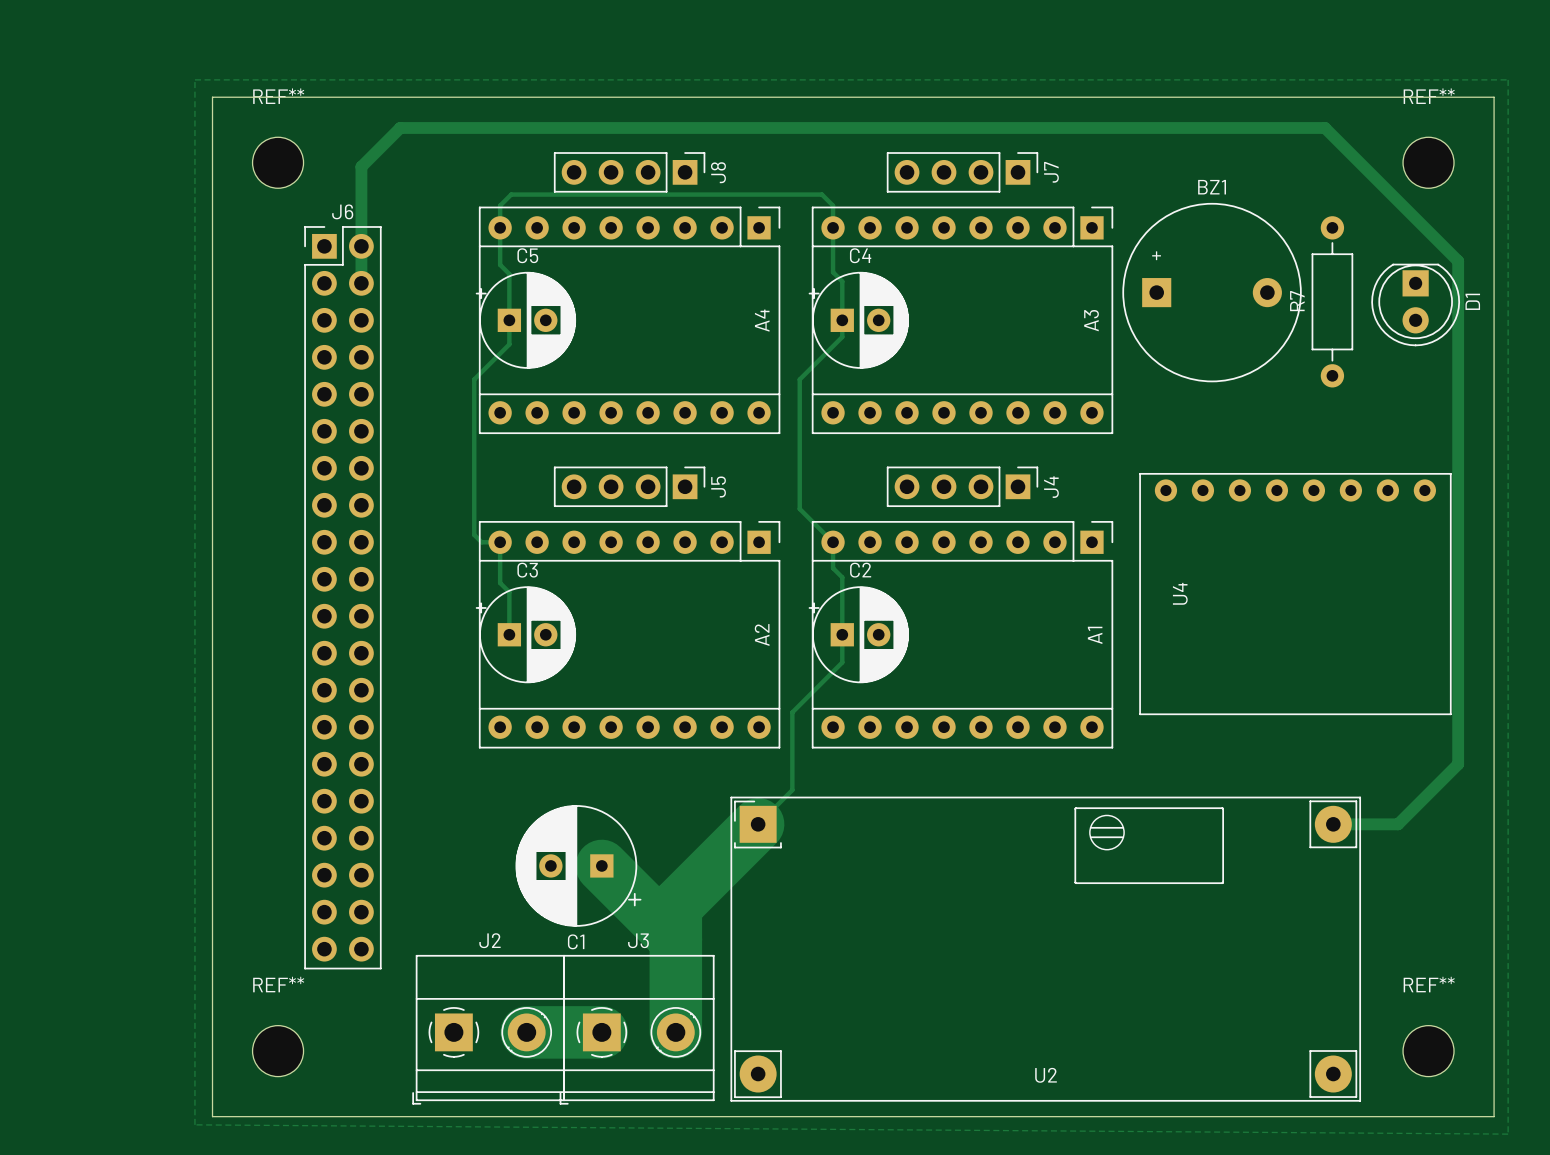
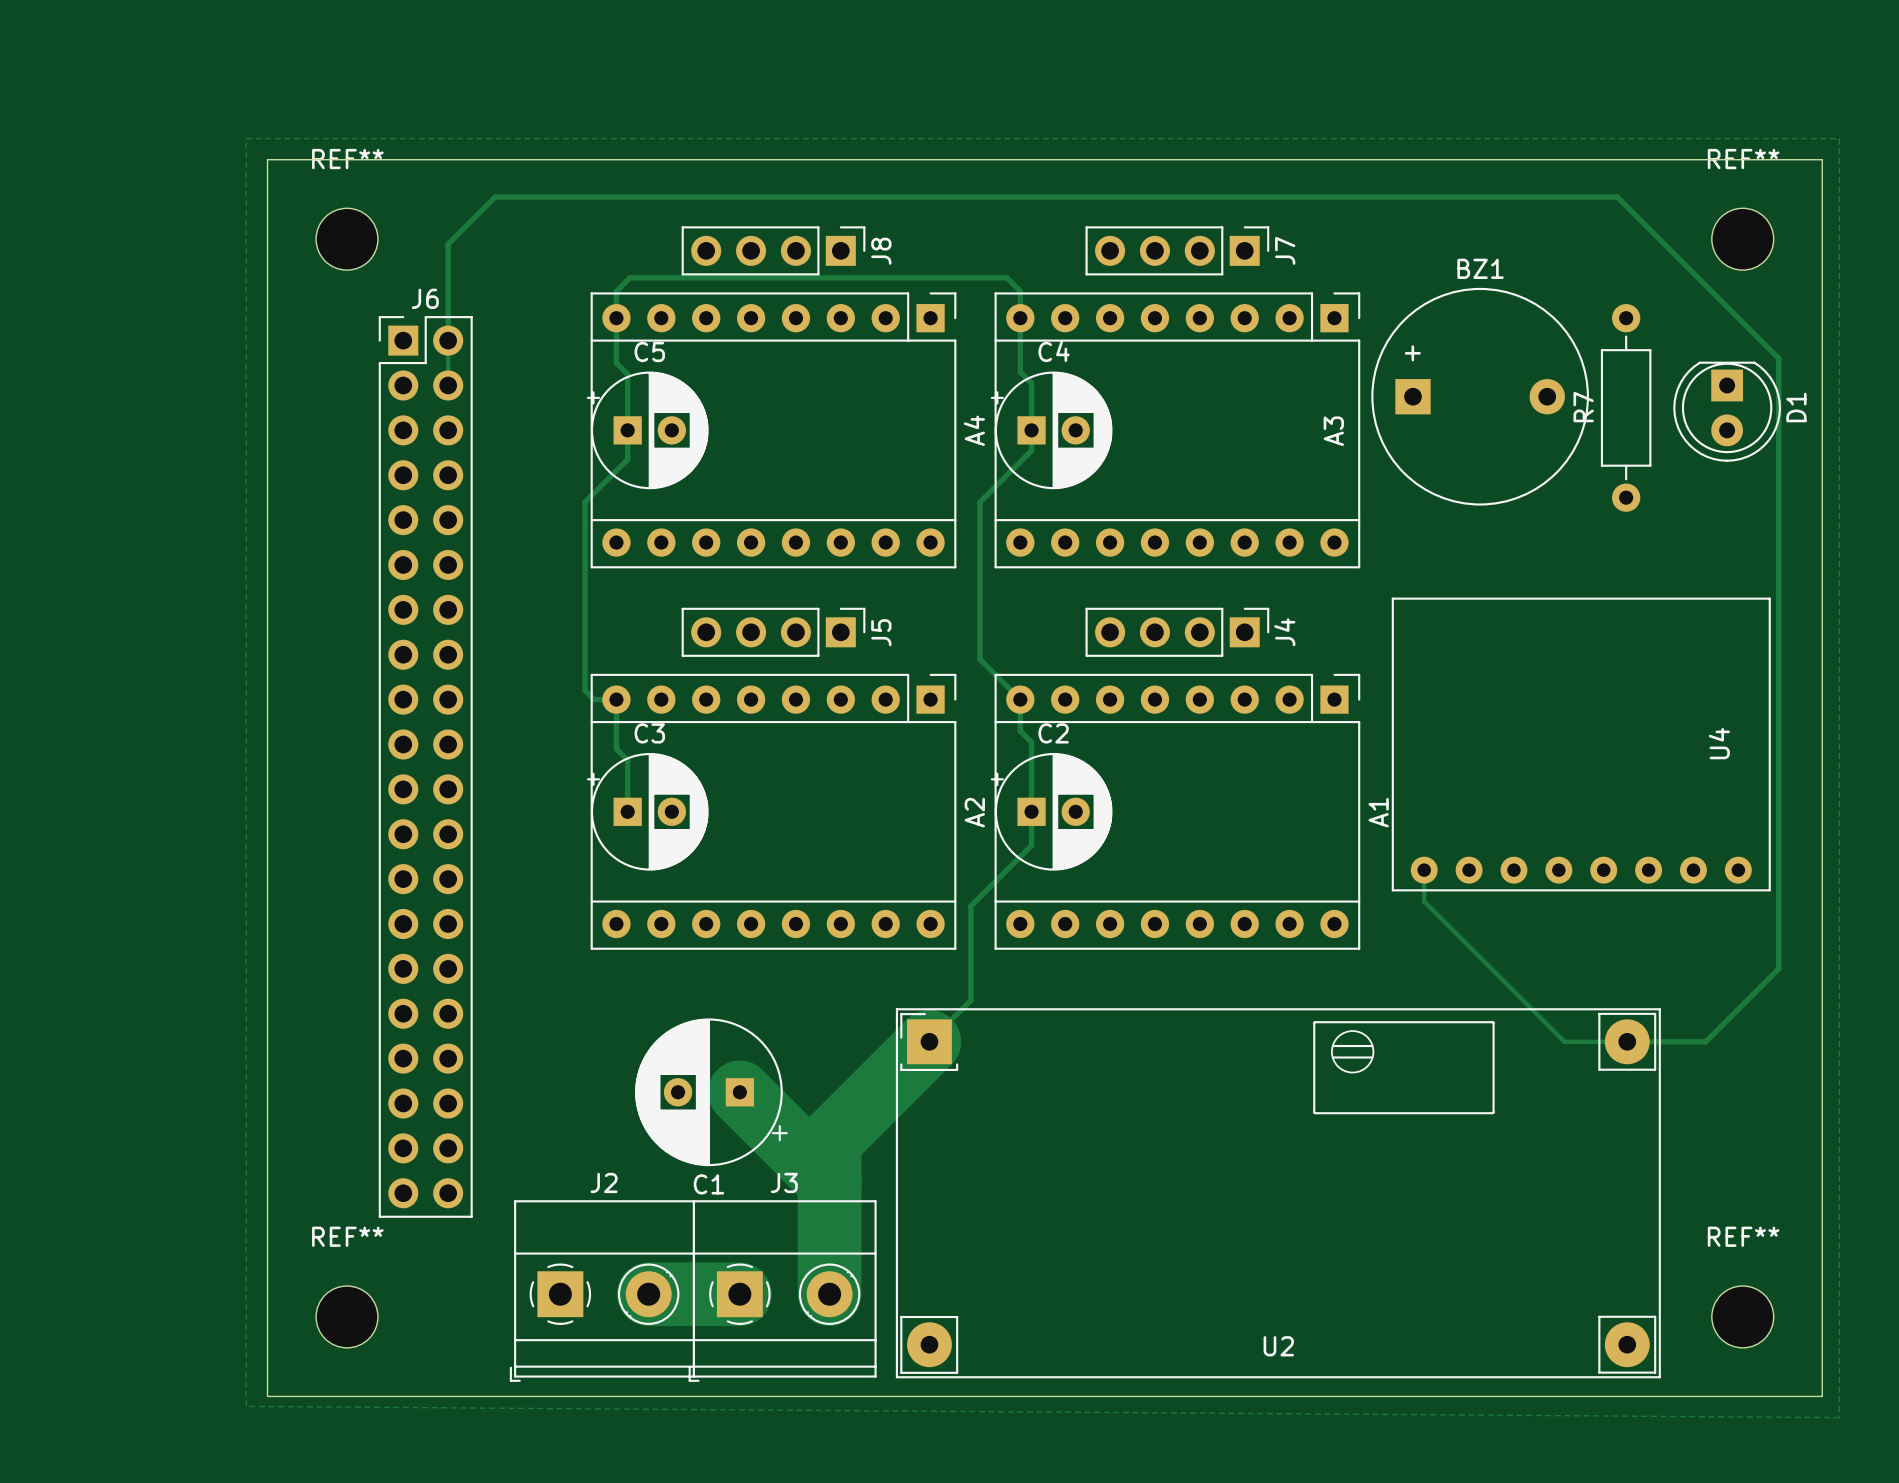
track width: thick (361, 283) (361, 166) (400, 127) (1325, 127) (1458, 261) (1458, 764) (1398, 824) (1333, 824) -> thin (448, 385) (448, 244) (495, 197) (1617, 197) (1778, 358) (1778, 968) (1705, 1041) (1627, 1041)
A4 name position: A4 (762, 320) -> A4 (974, 430)
U4 rotation: 0° (1295, 594) -> 180° (1581, 744)
A2 name position: A2 (762, 635) -> A2 (974, 812)
A1 name position: A1 (1095, 635) -> A1 (1378, 812)
track: none -> (1424, 870) (1424, 901) (1564, 1041) (1627, 1041)

